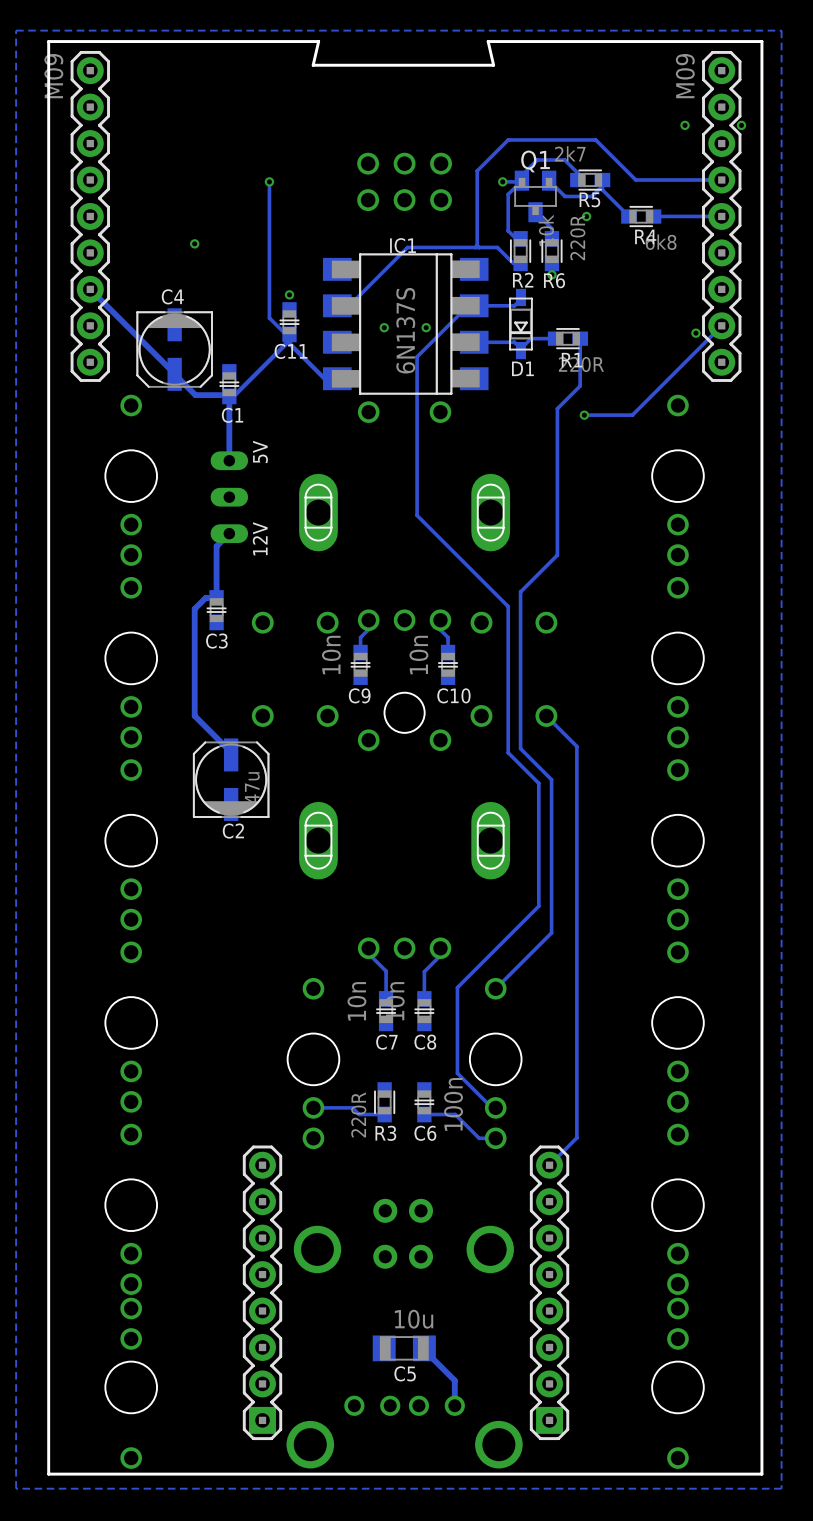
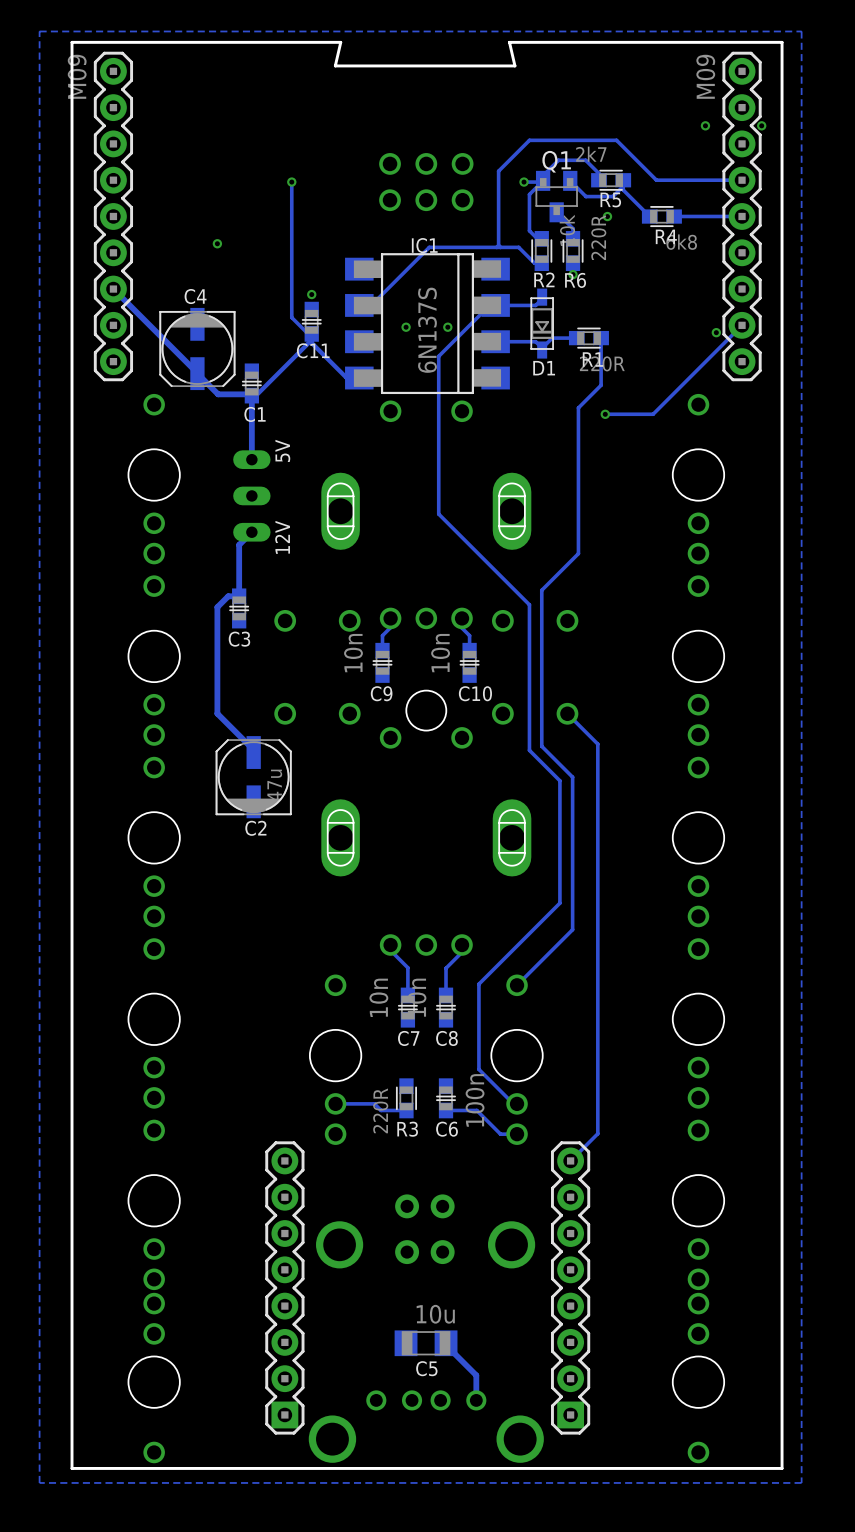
D1 footprint: [509, 288, 533, 360] -> [530, 288, 554, 359]

